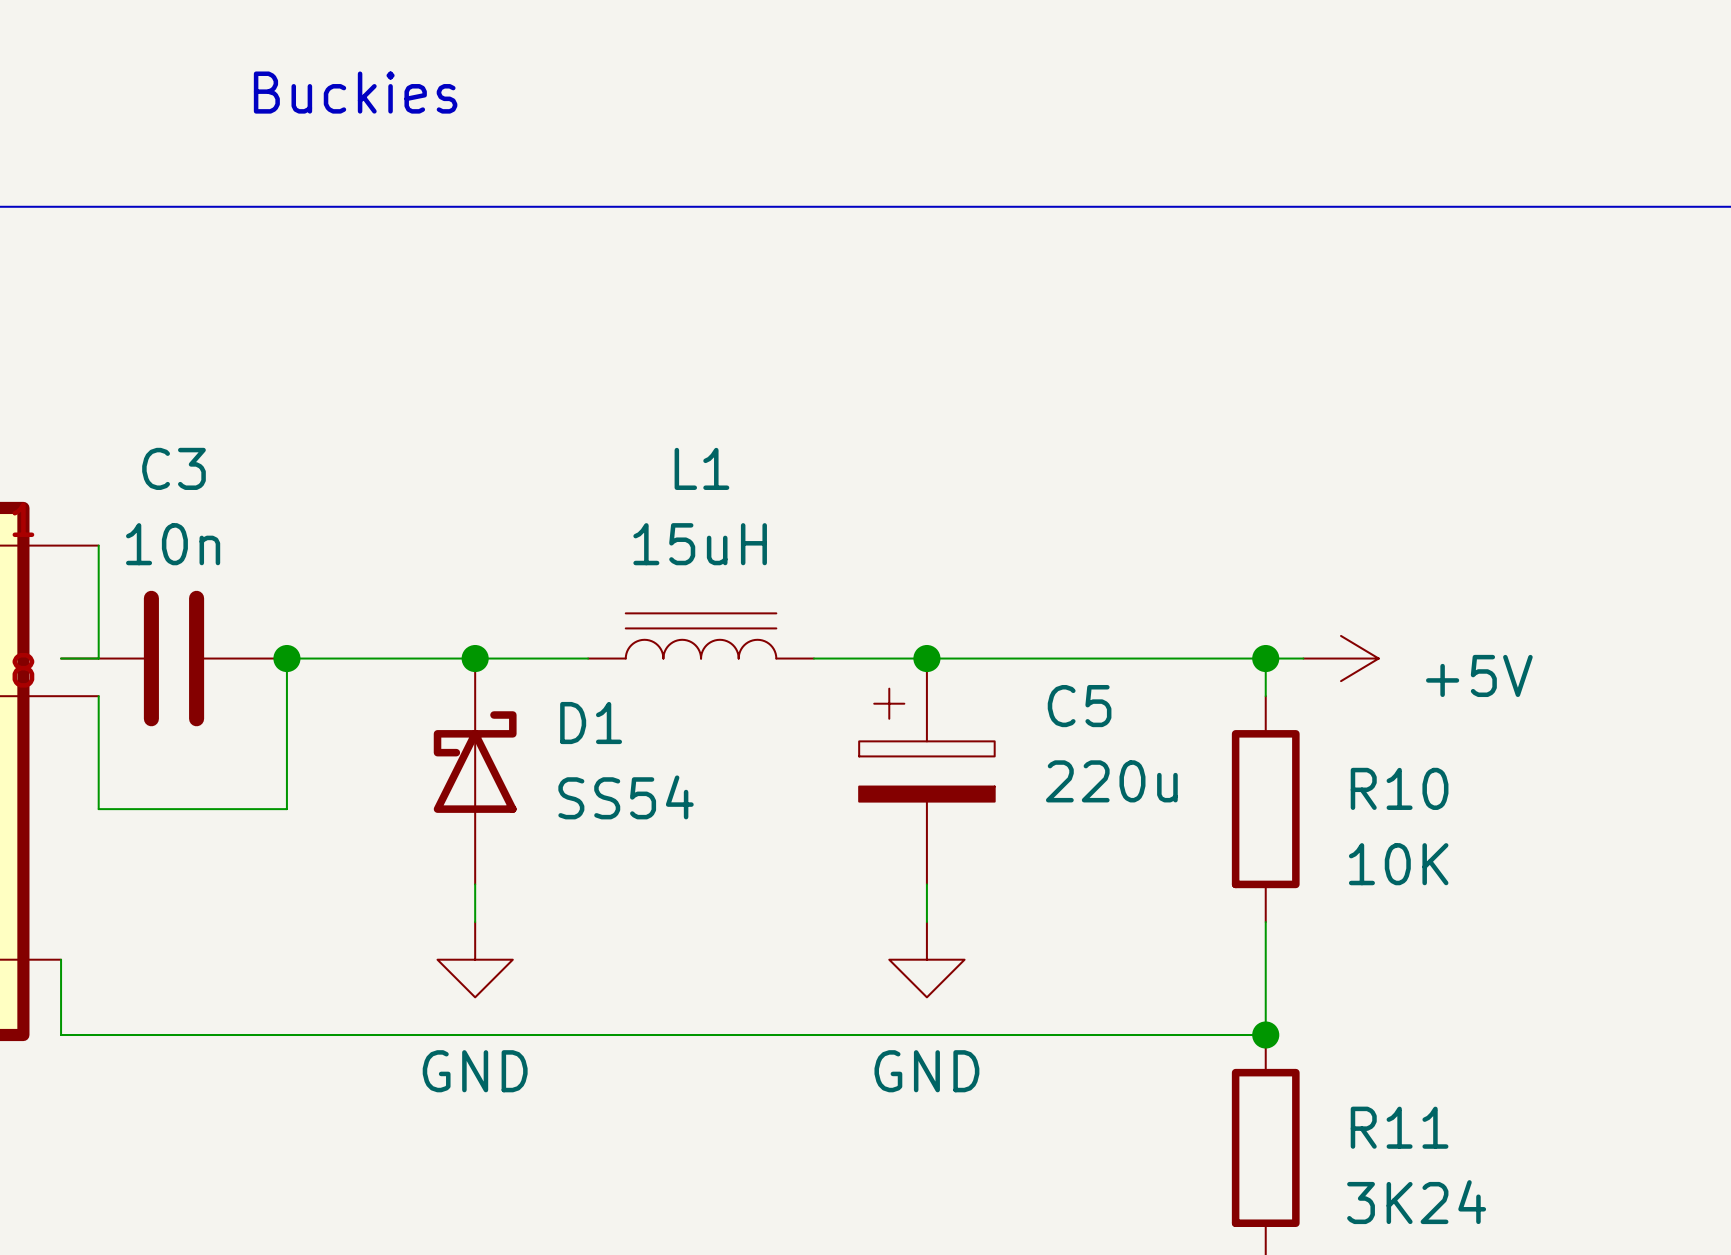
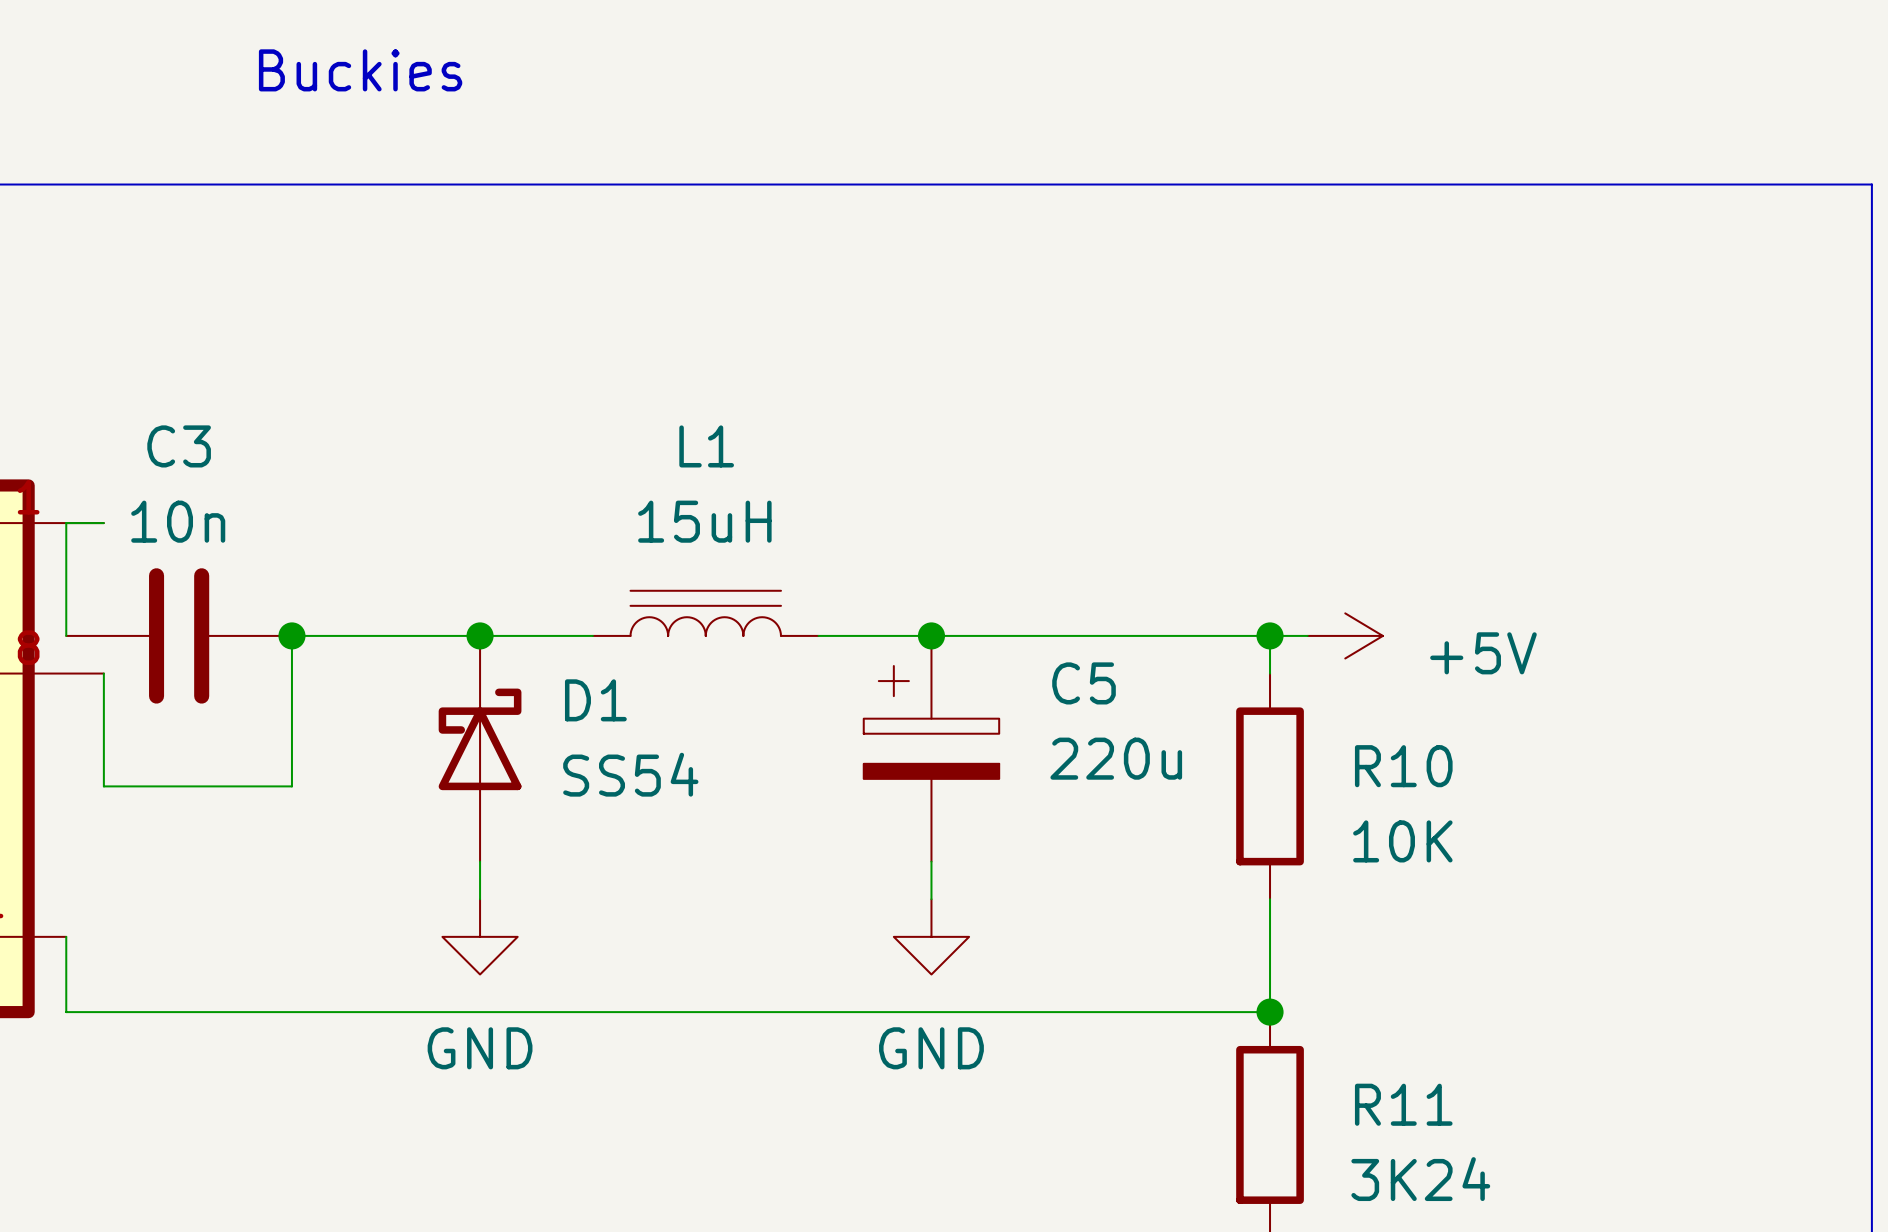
wire: (98, 545) (98, 658) (61, 658) -> (103, 523) (66, 523) (66, 635)

